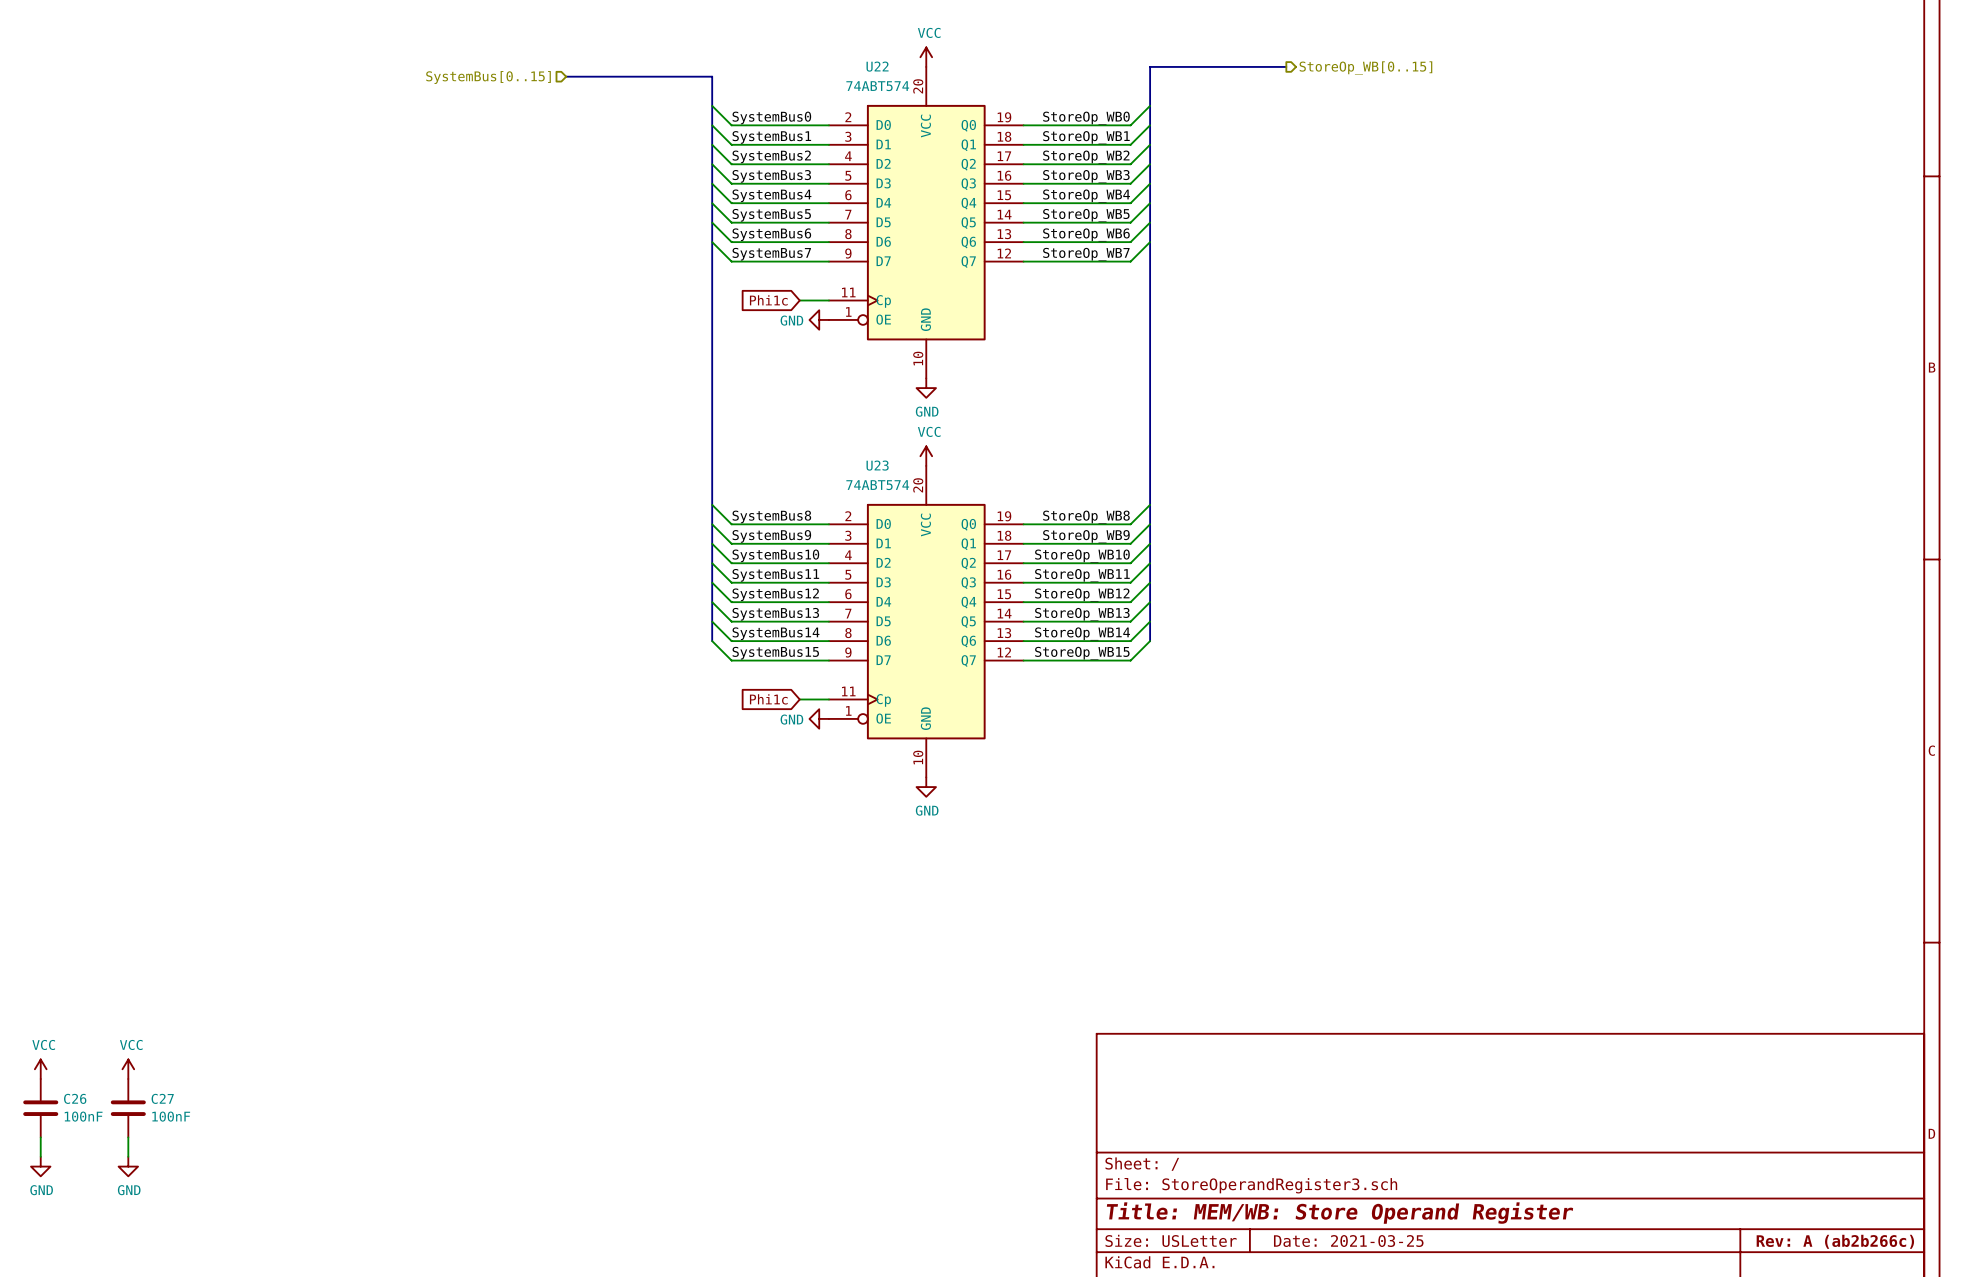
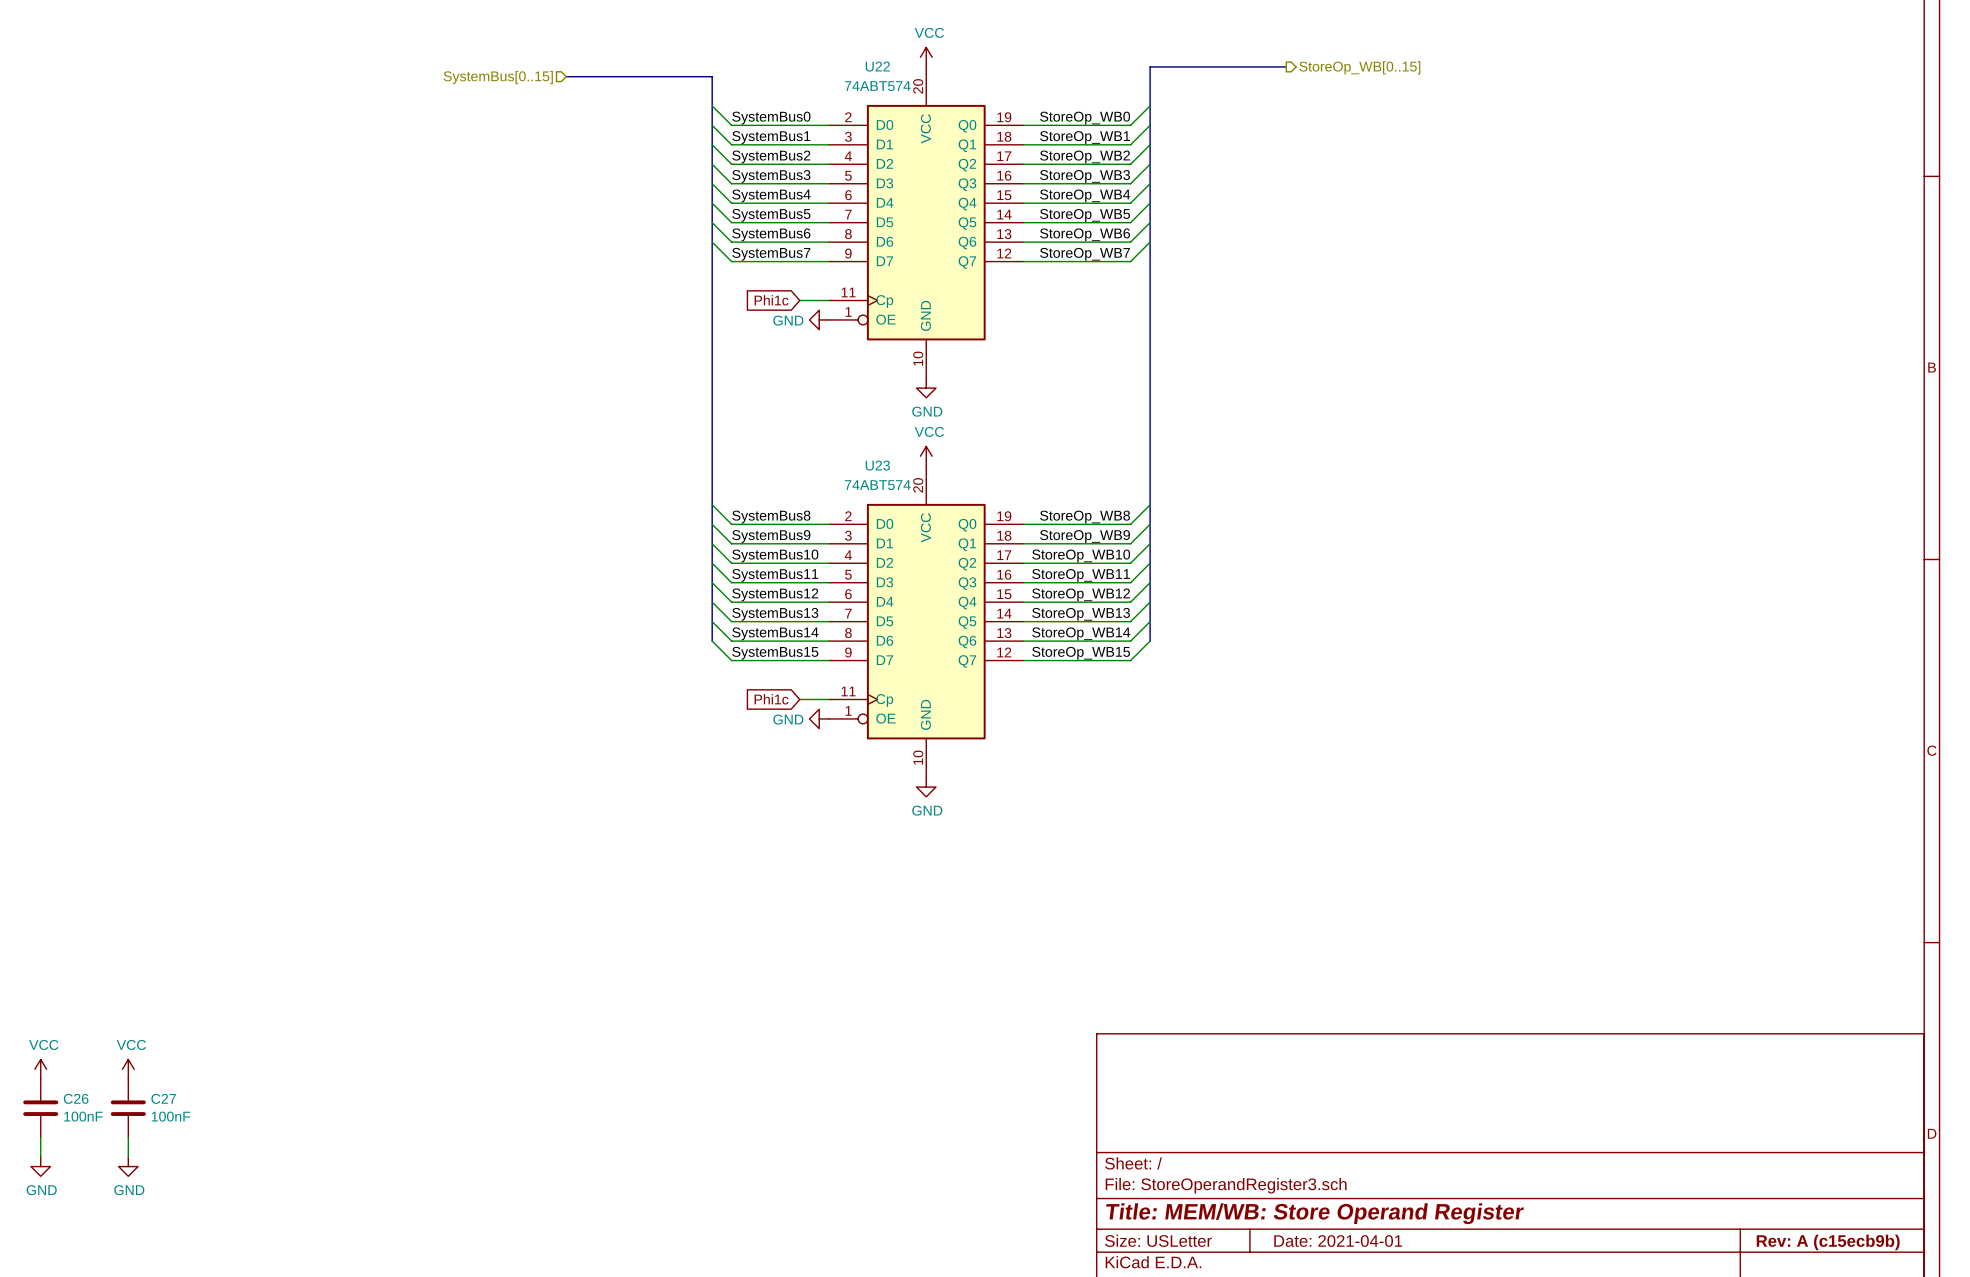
title block: Date: 2021-03-25 (1348, 1241) -> Date: 2021-04-01 (1338, 1241)
title block: Rev: A (ab2b266c) (1835, 1241) -> Rev: A (c15ecb9b) (1828, 1242)

